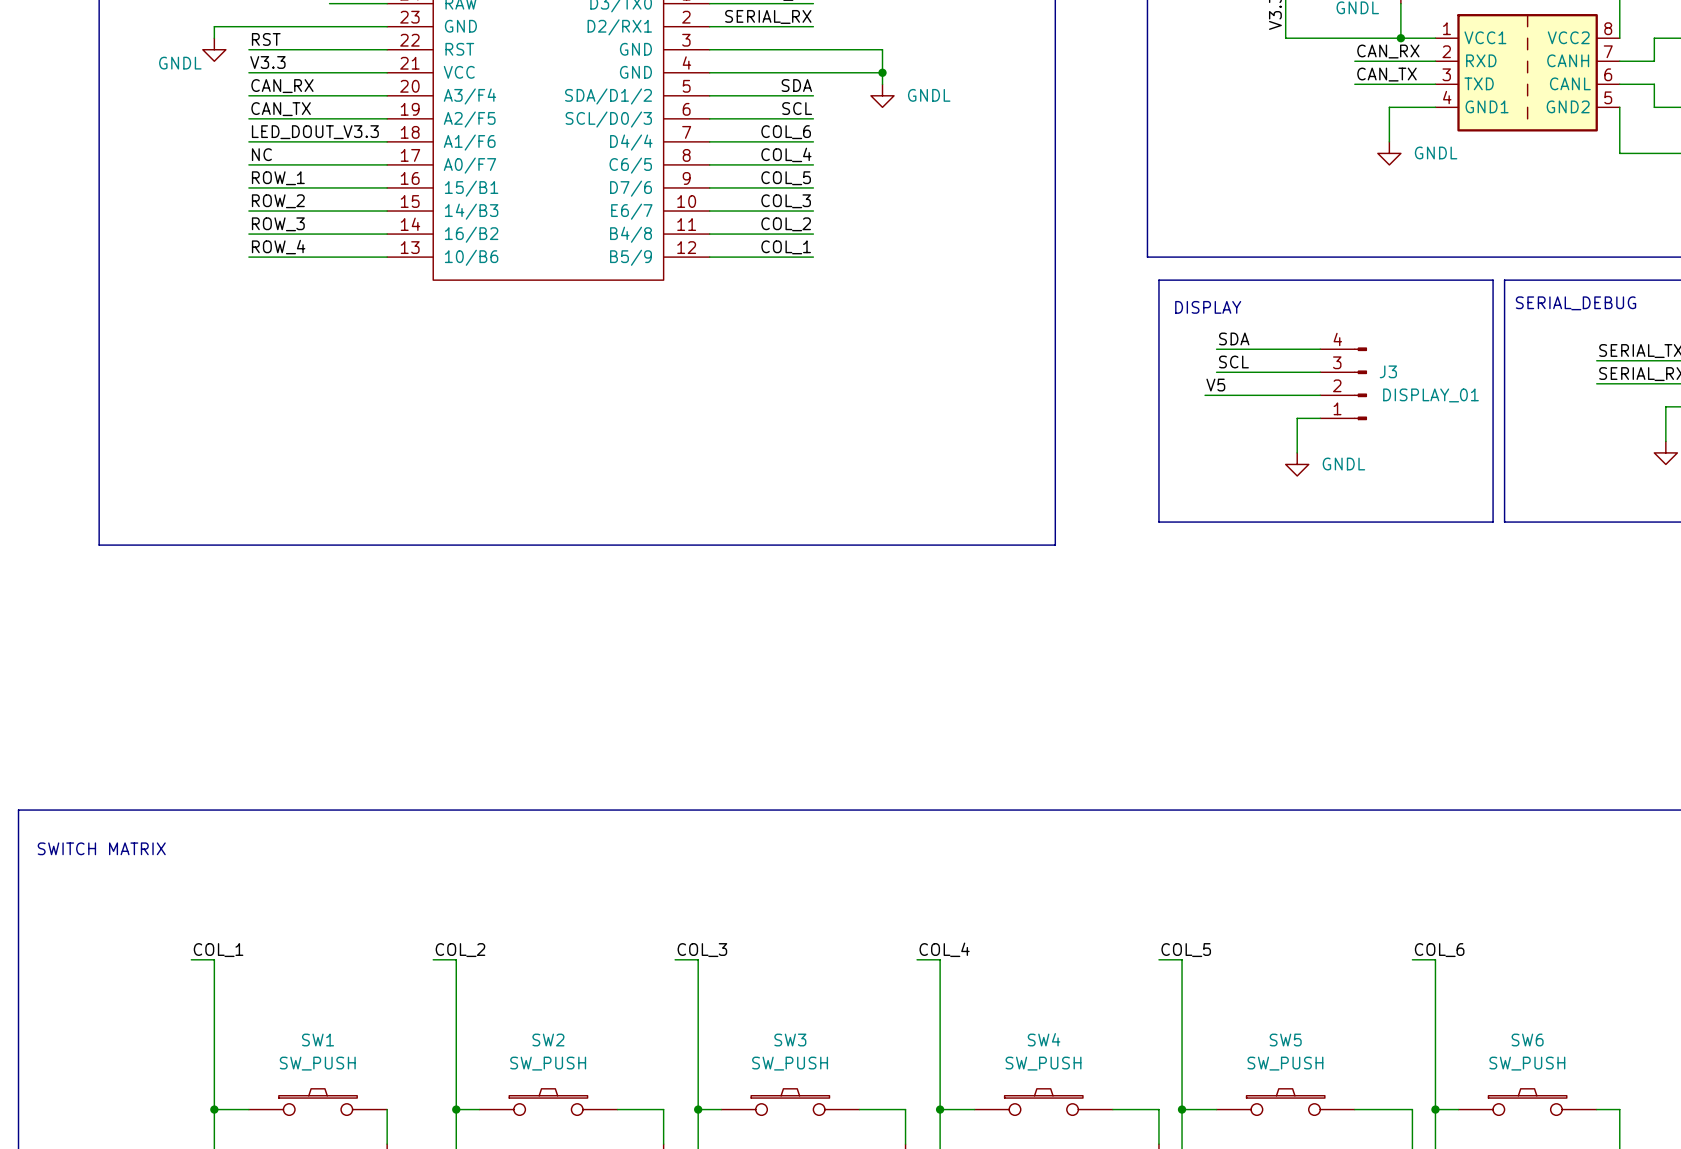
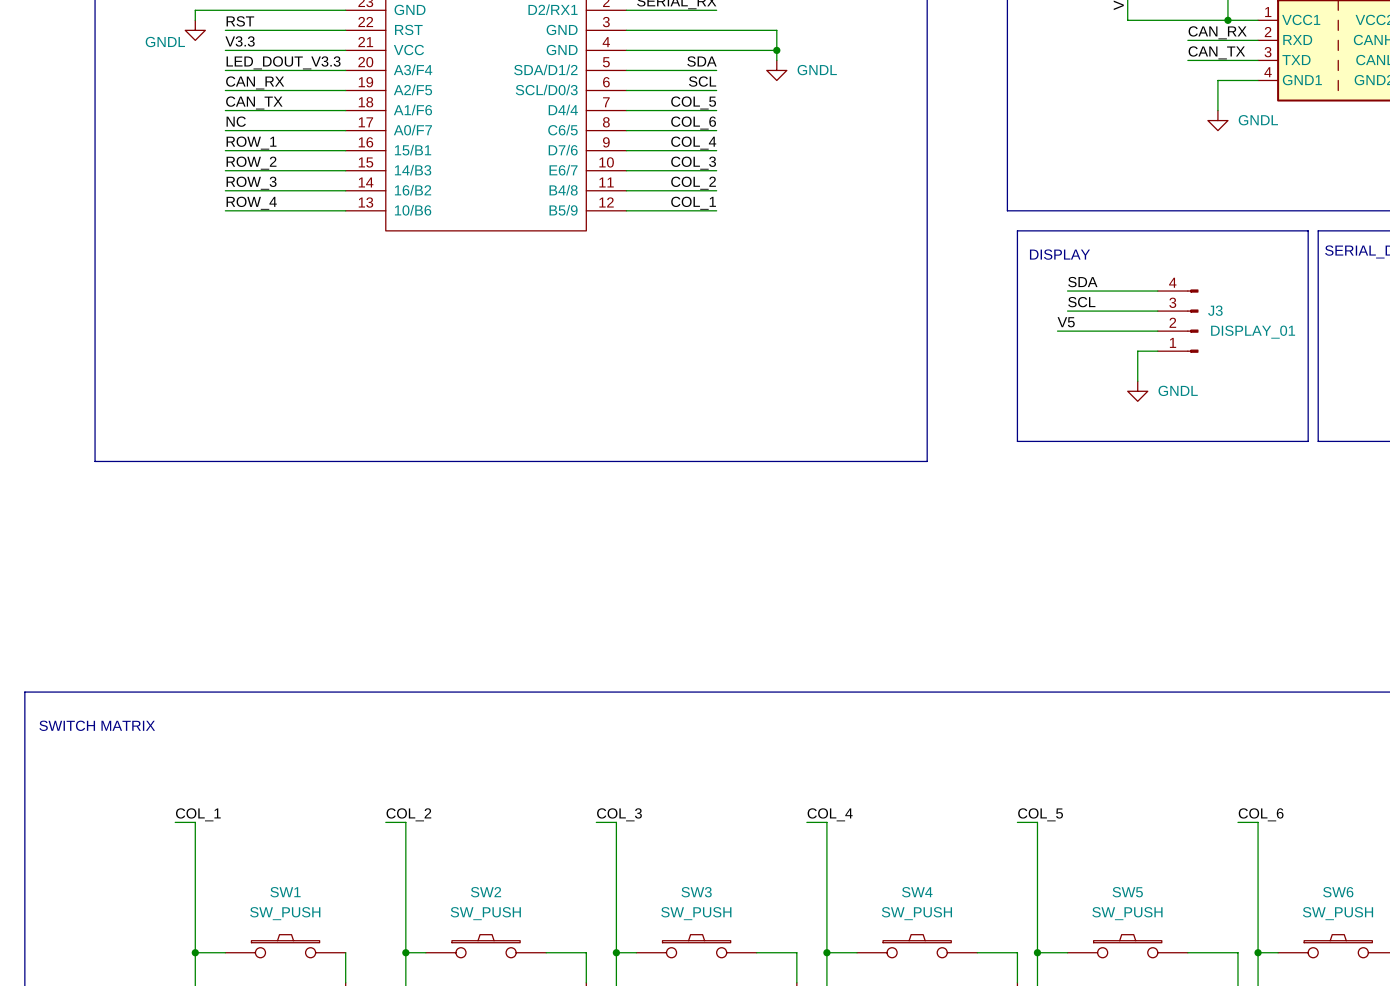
label: CAN_RX (282, 86) -> LED_DOUT_V3.3 (283, 62)
label: CAN_TX (281, 109) -> CAN_RX (255, 82)
label: LED_DOUT_V3.3 (315, 132) -> CAN_TX (254, 102)
label: COL_6 (786, 132) -> COL_5 (693, 102)
label: COL_4 (786, 154) -> COL_6 (693, 123)
label: COL_5 (786, 178) -> COL_4 (693, 143)

